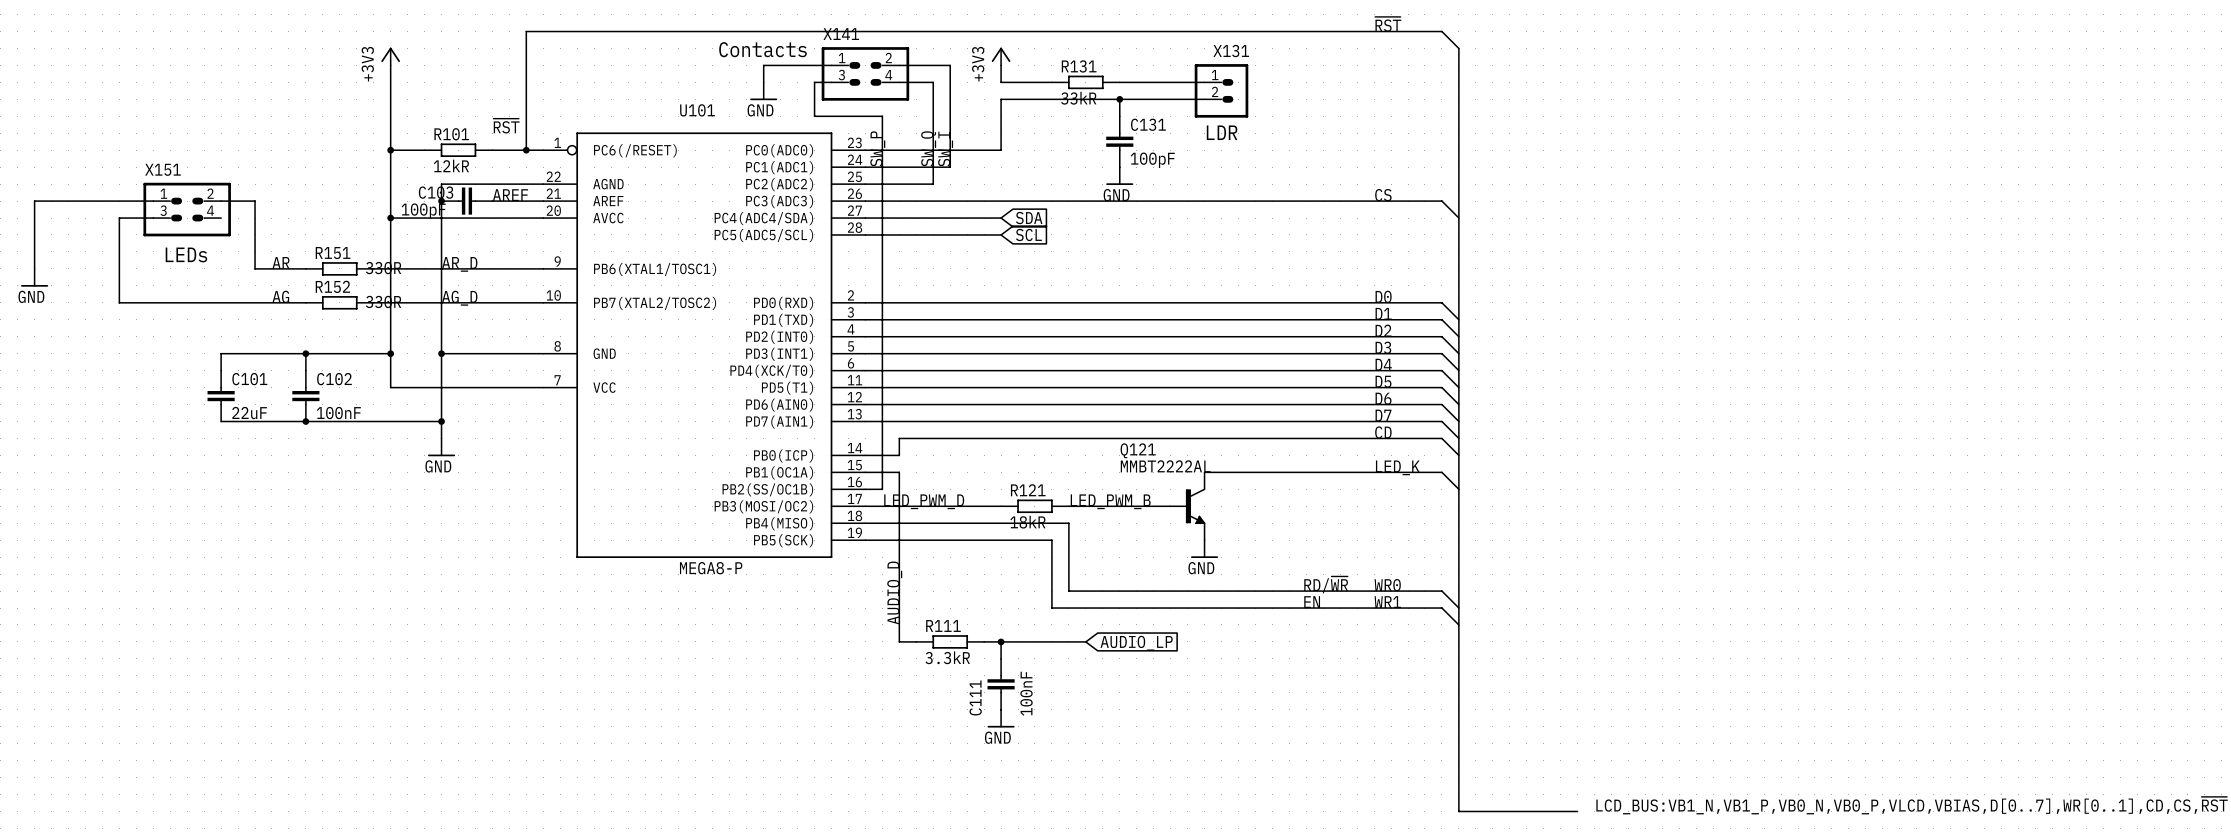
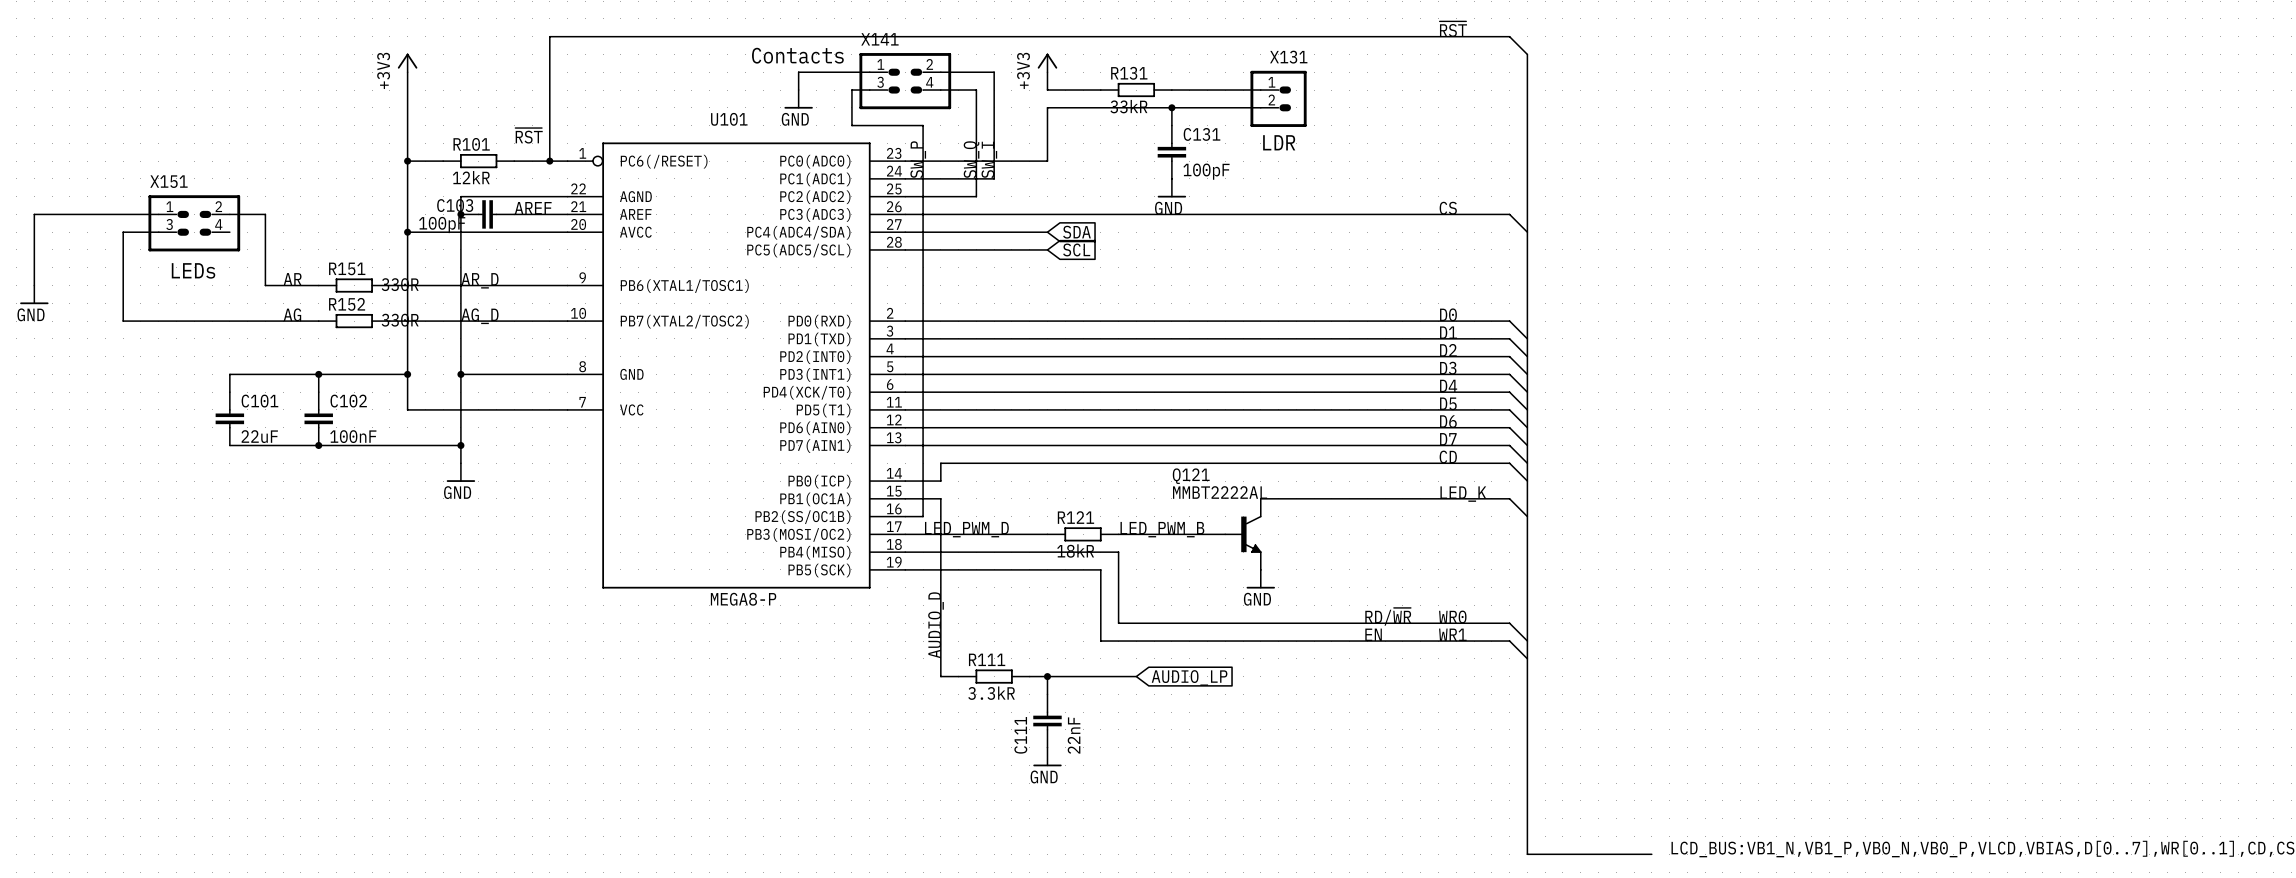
C111 value: 100nF (1026, 693) -> 22nF (1074, 735)

